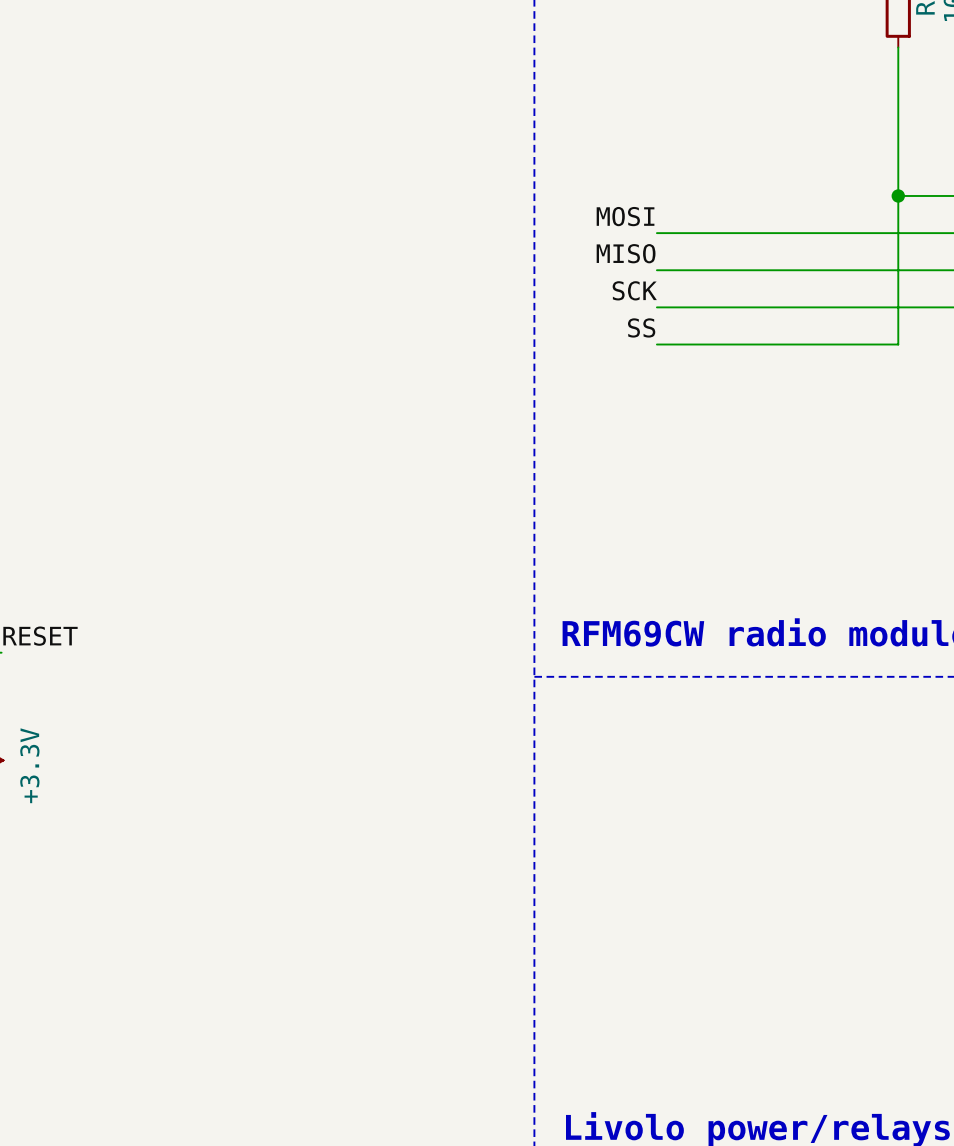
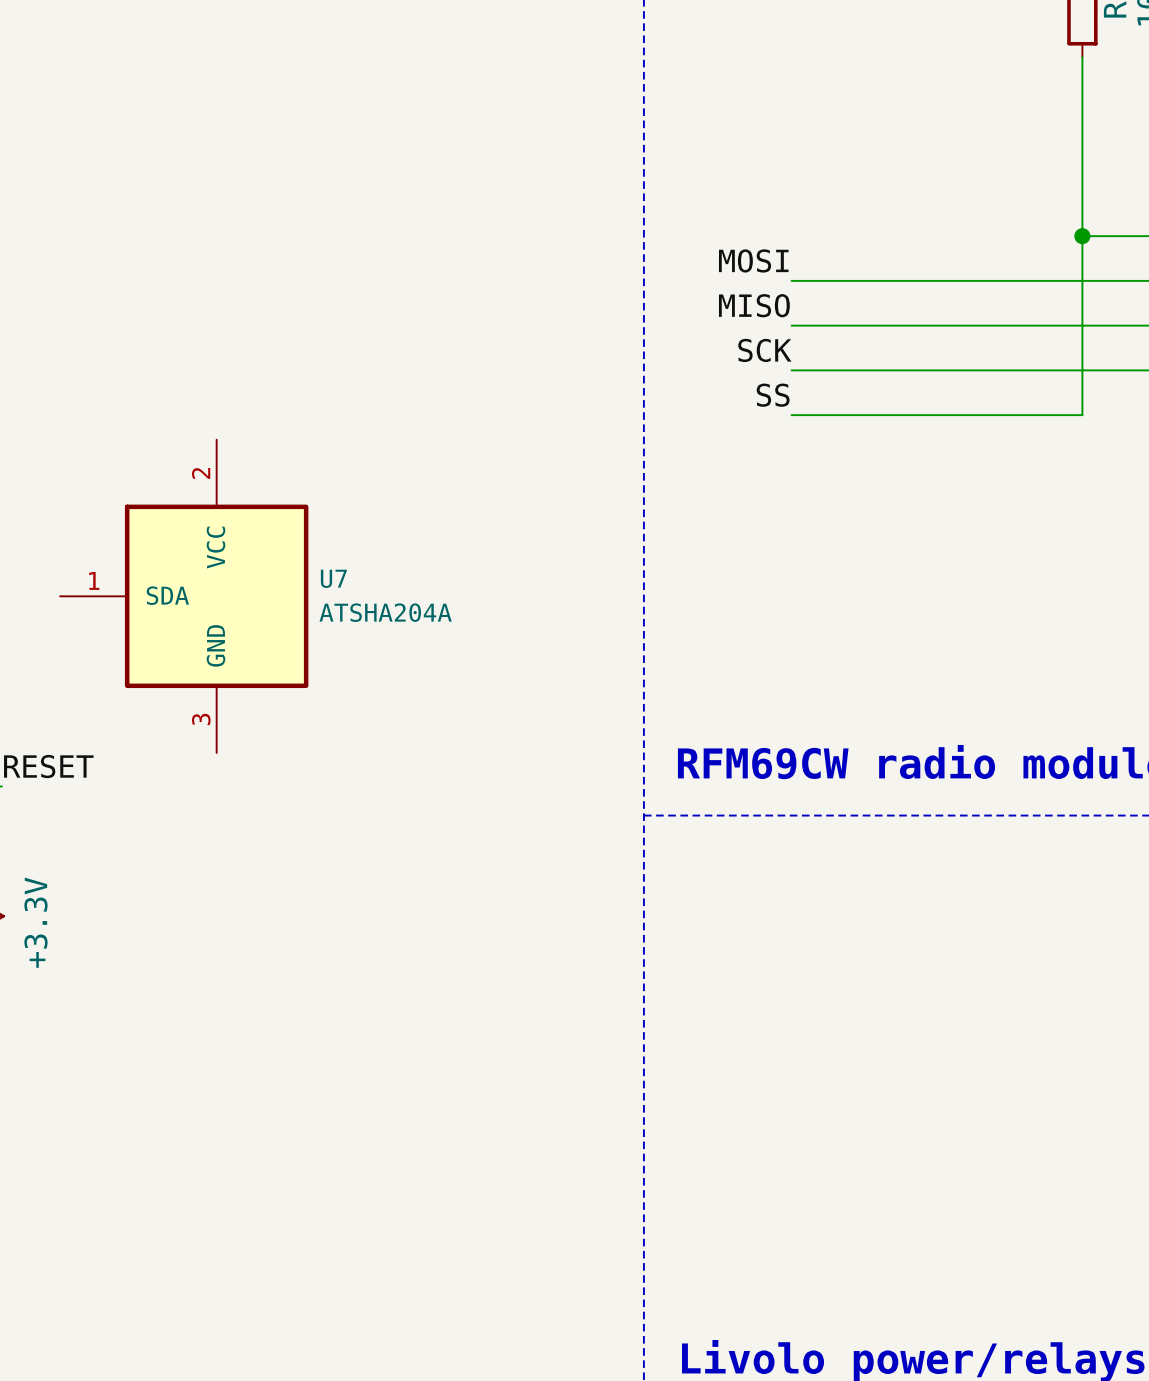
U7: none -> ATSHA204A (184, 596)

